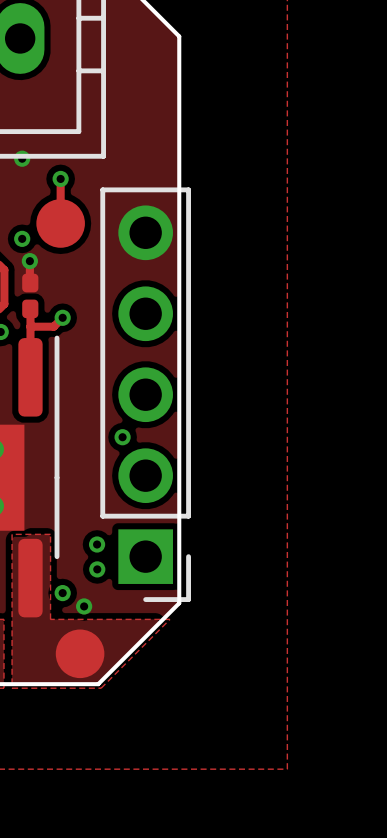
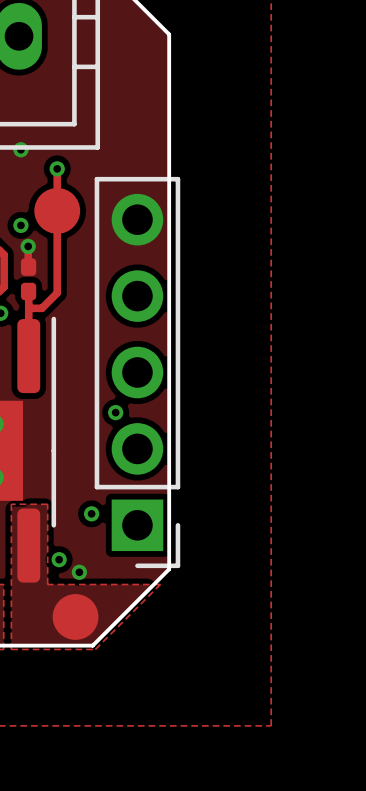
track: (62, 317) (53, 326) (44, 326) -> (57, 210) (57, 293) (41, 308)
via: (62, 317) -> none
via: (97, 569) -> none

